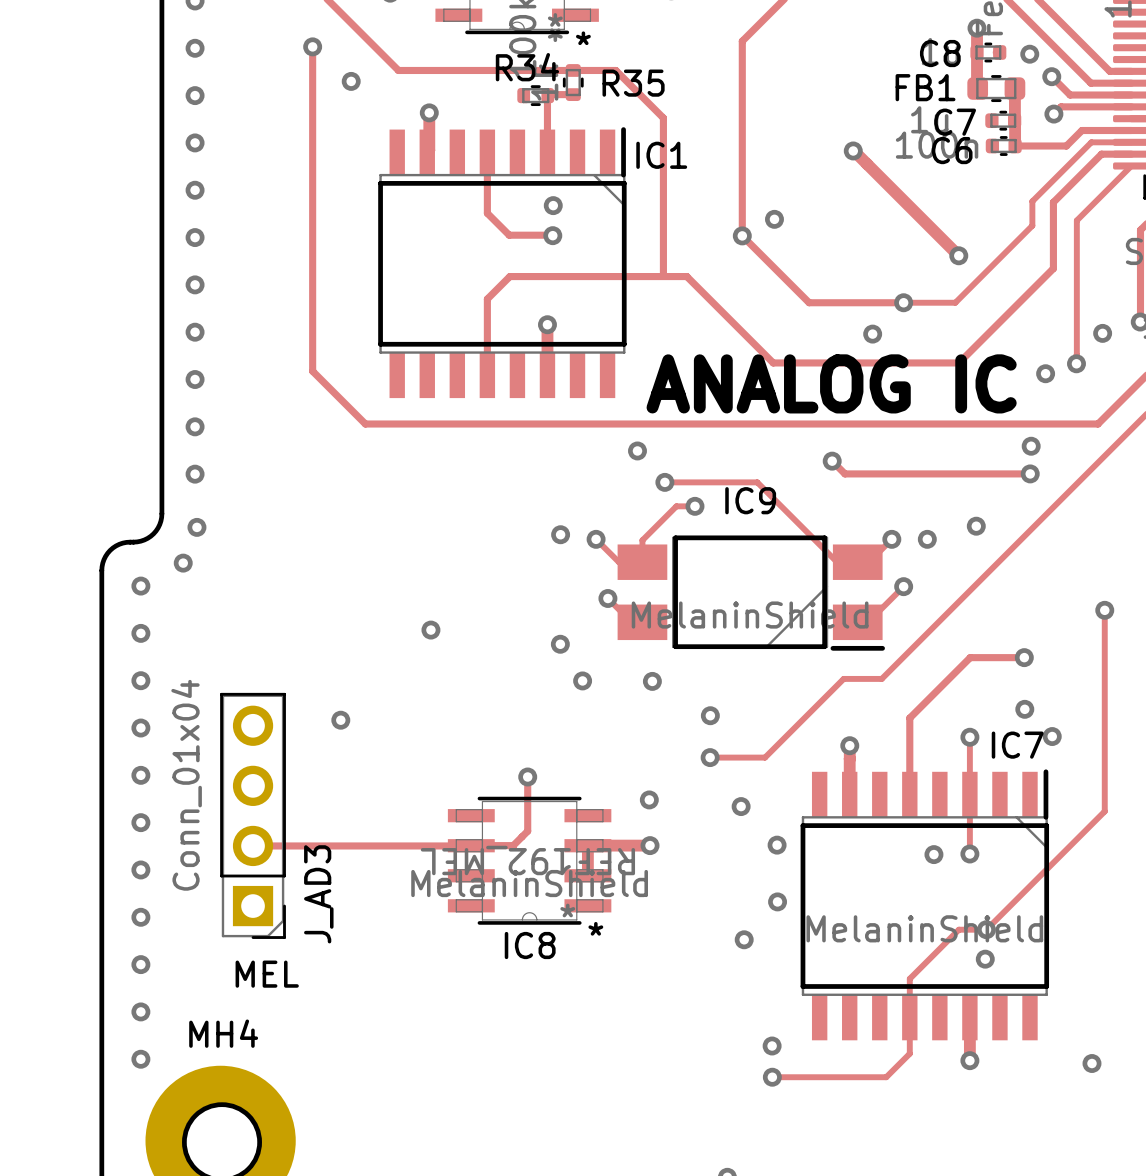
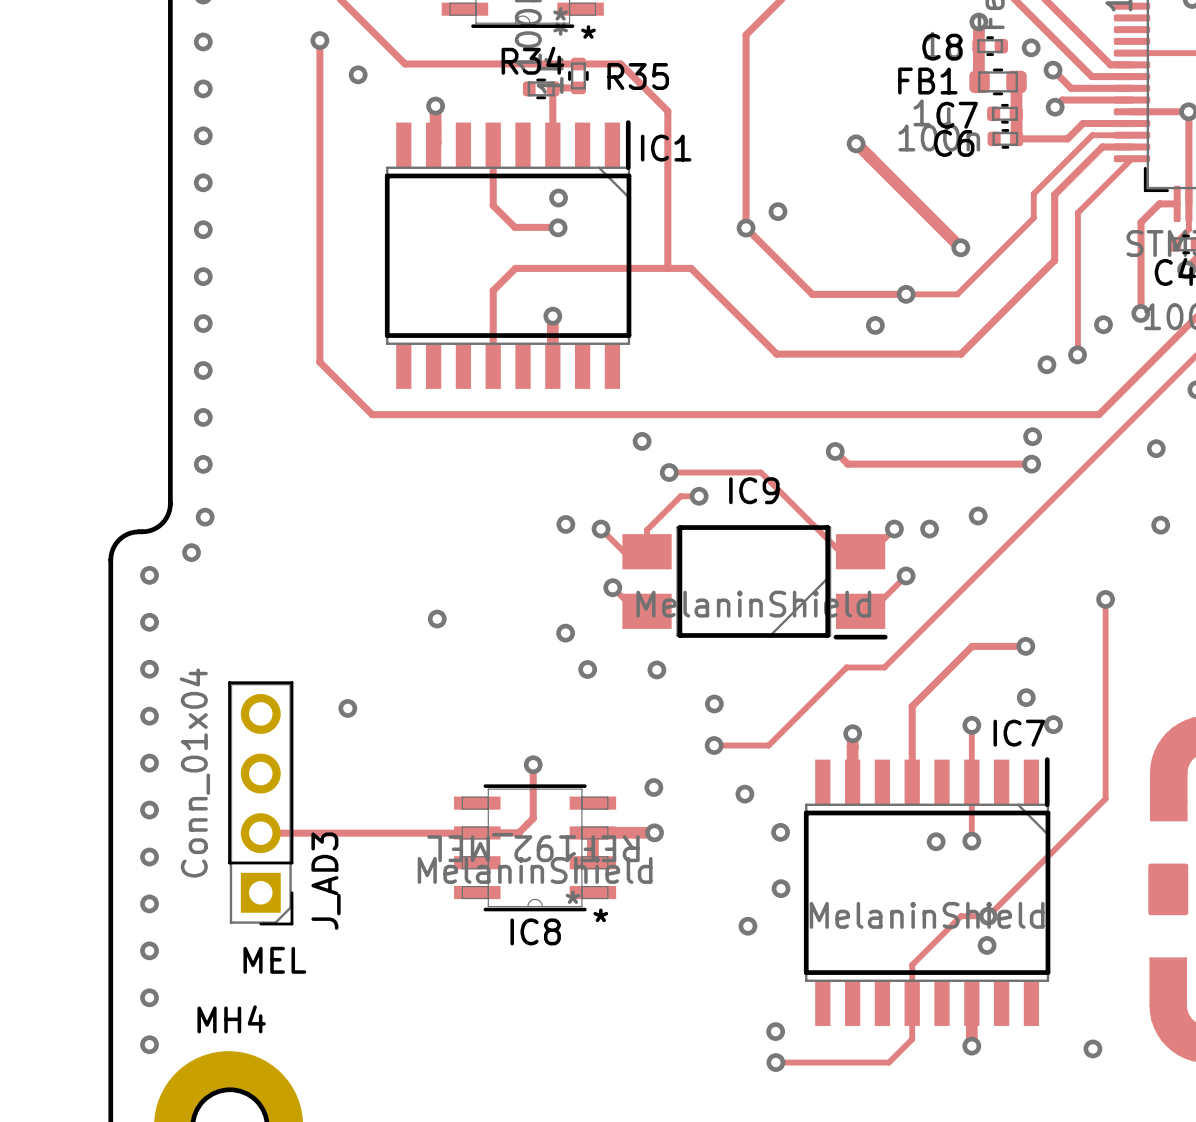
text: ANALOG IC (831, 383) -> none

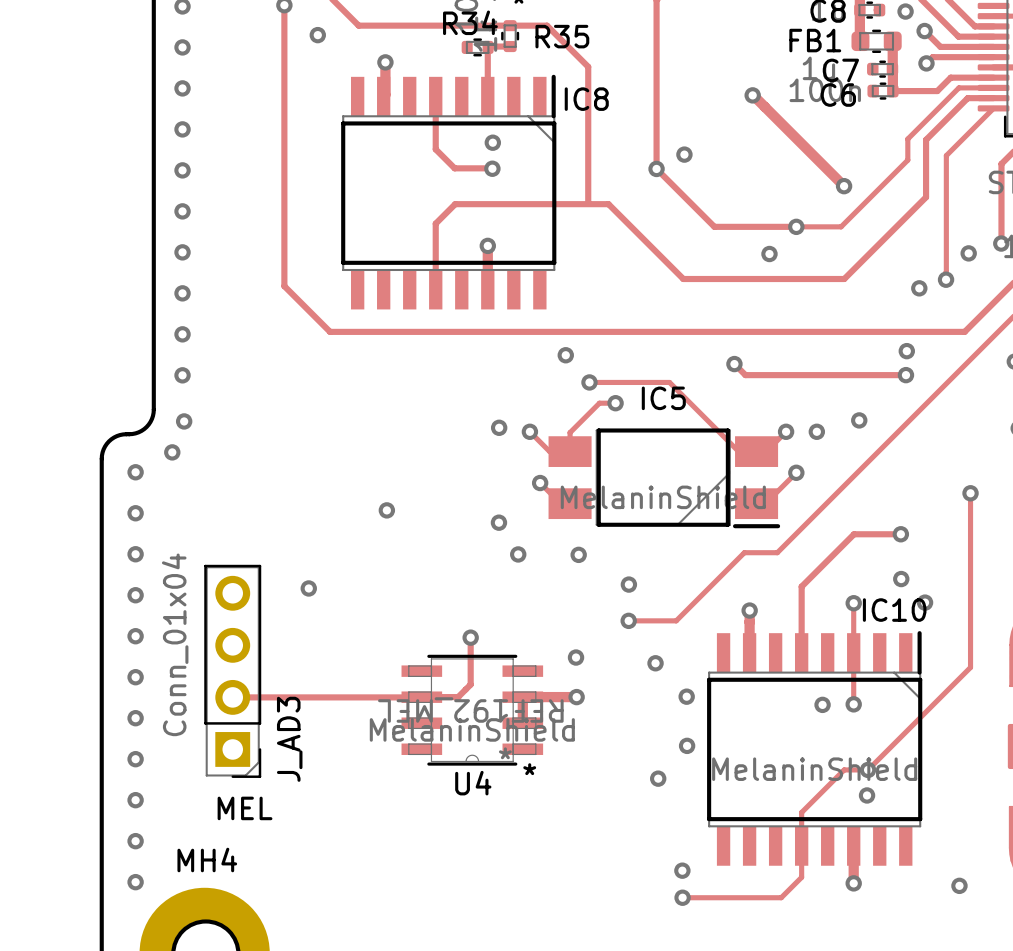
IC1 name: IC1 (666, 148) -> IC8 (586, 99)
IC9 name: IC9 (754, 490) -> IC5 (663, 398)
IC7 name: IC7 (1019, 733) -> IC10 (894, 610)
IC8 name: IC8 (535, 931) -> U4 (473, 783)

